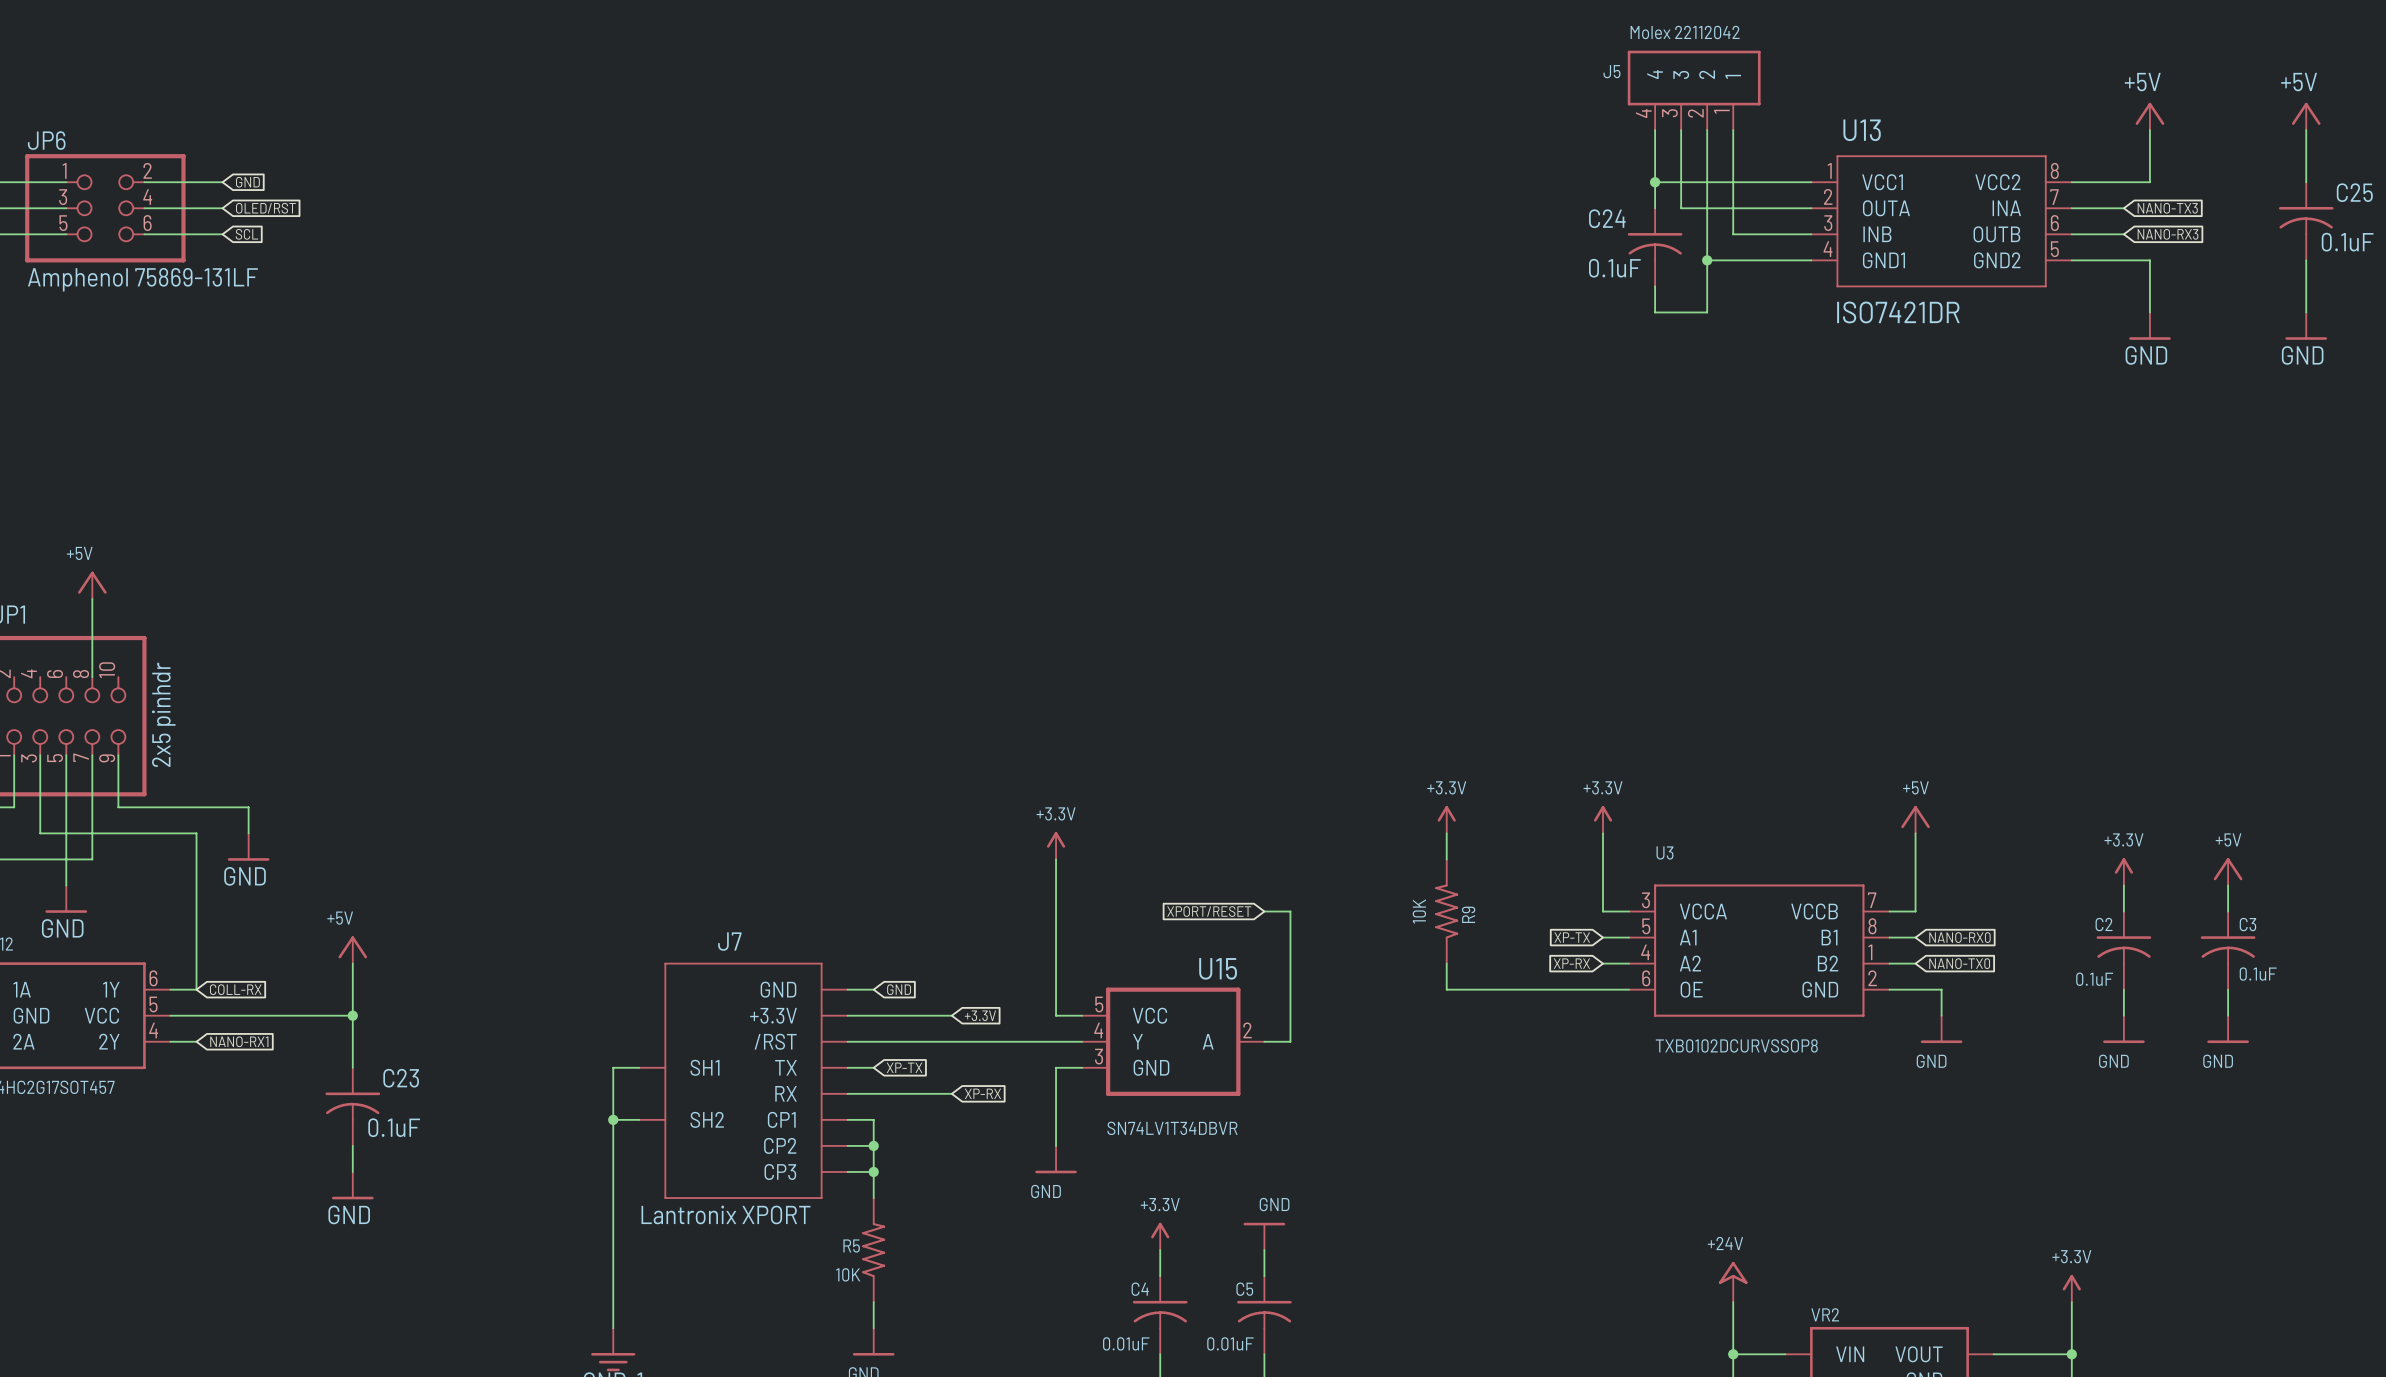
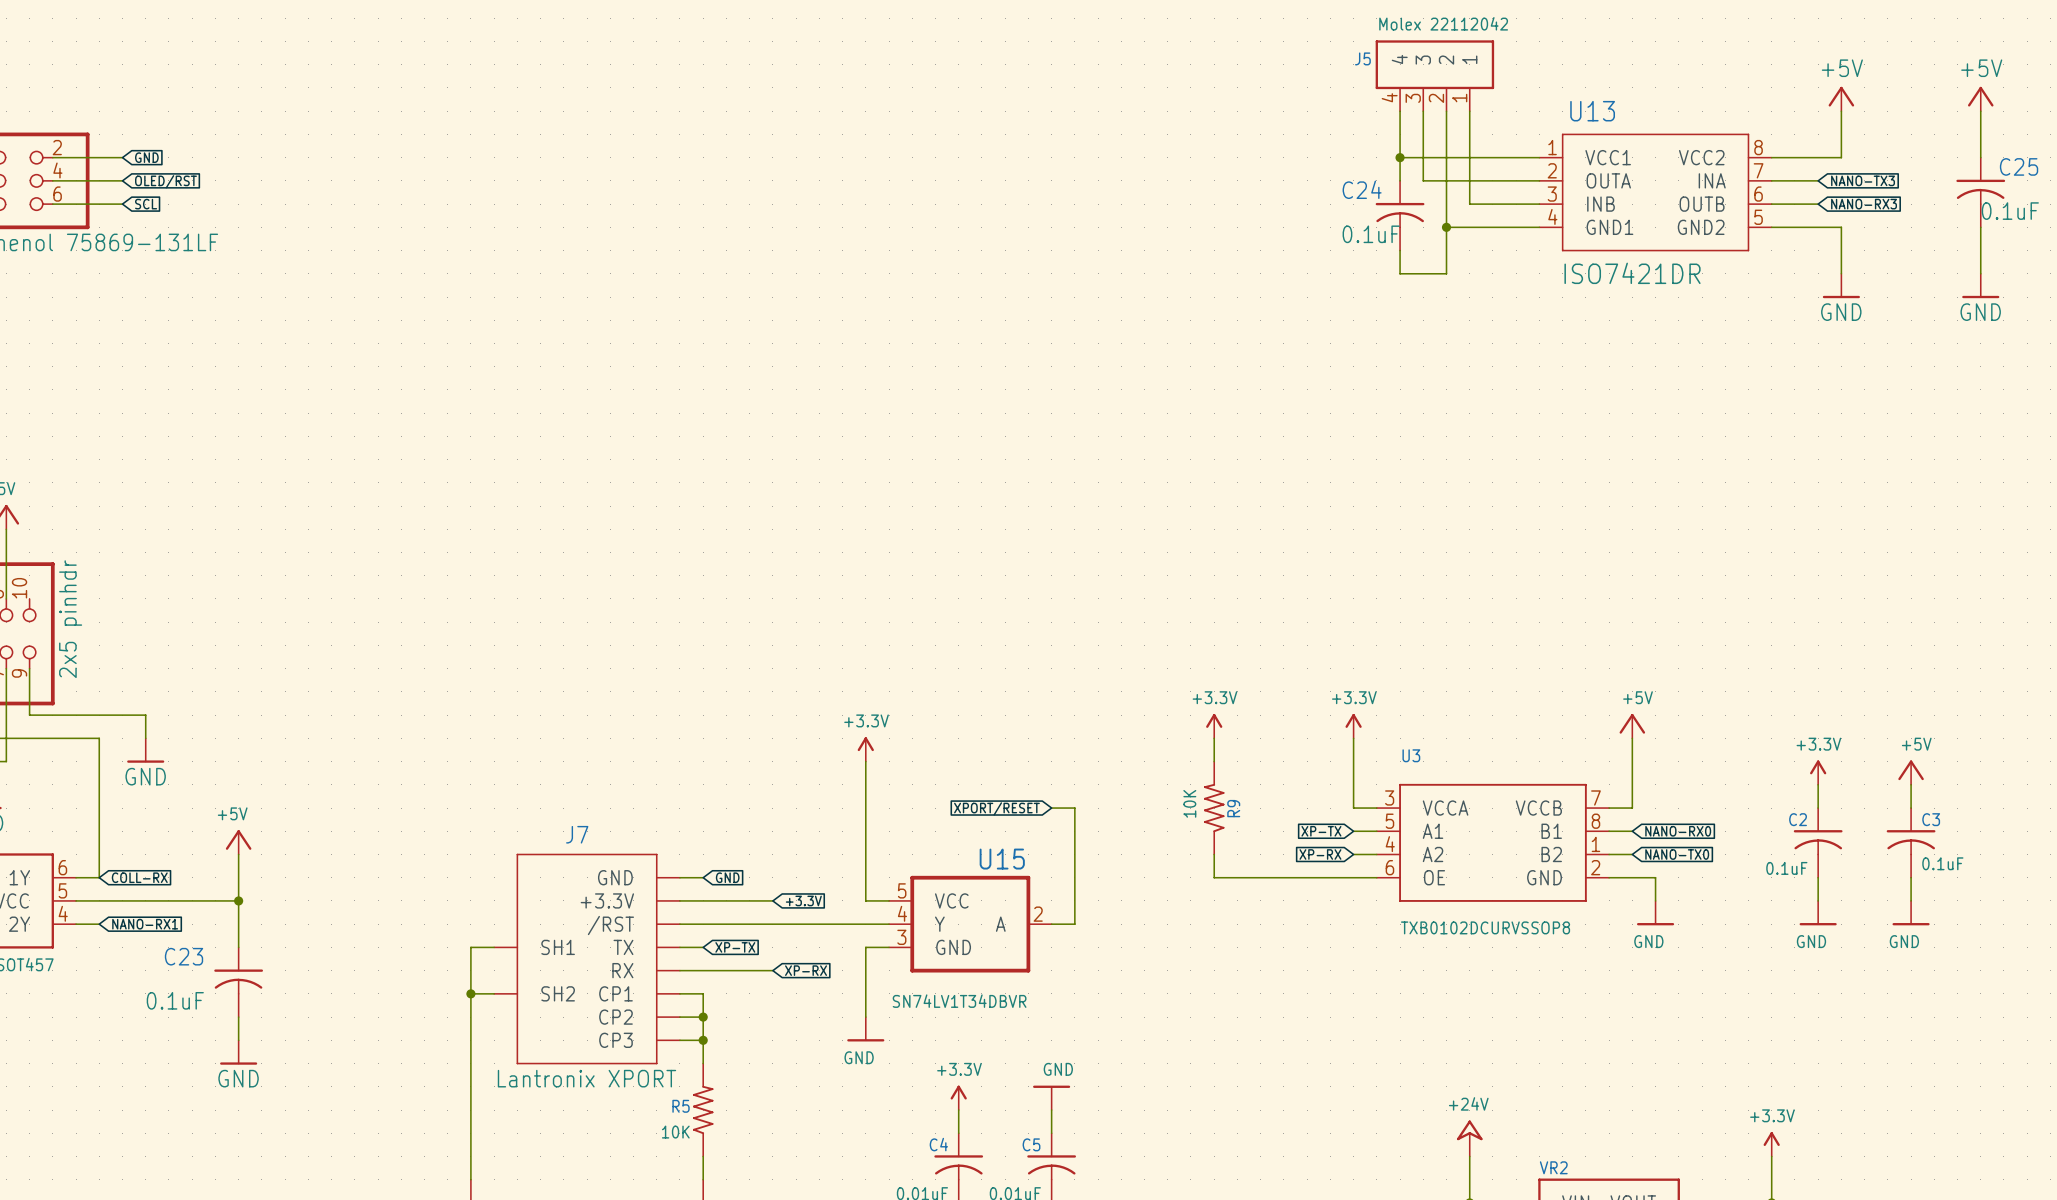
C23 name position: C23 (401, 1078) -> C23 (184, 956)
C23 value position: 0.1uF (394, 1127) -> 0.1uF (175, 1000)

